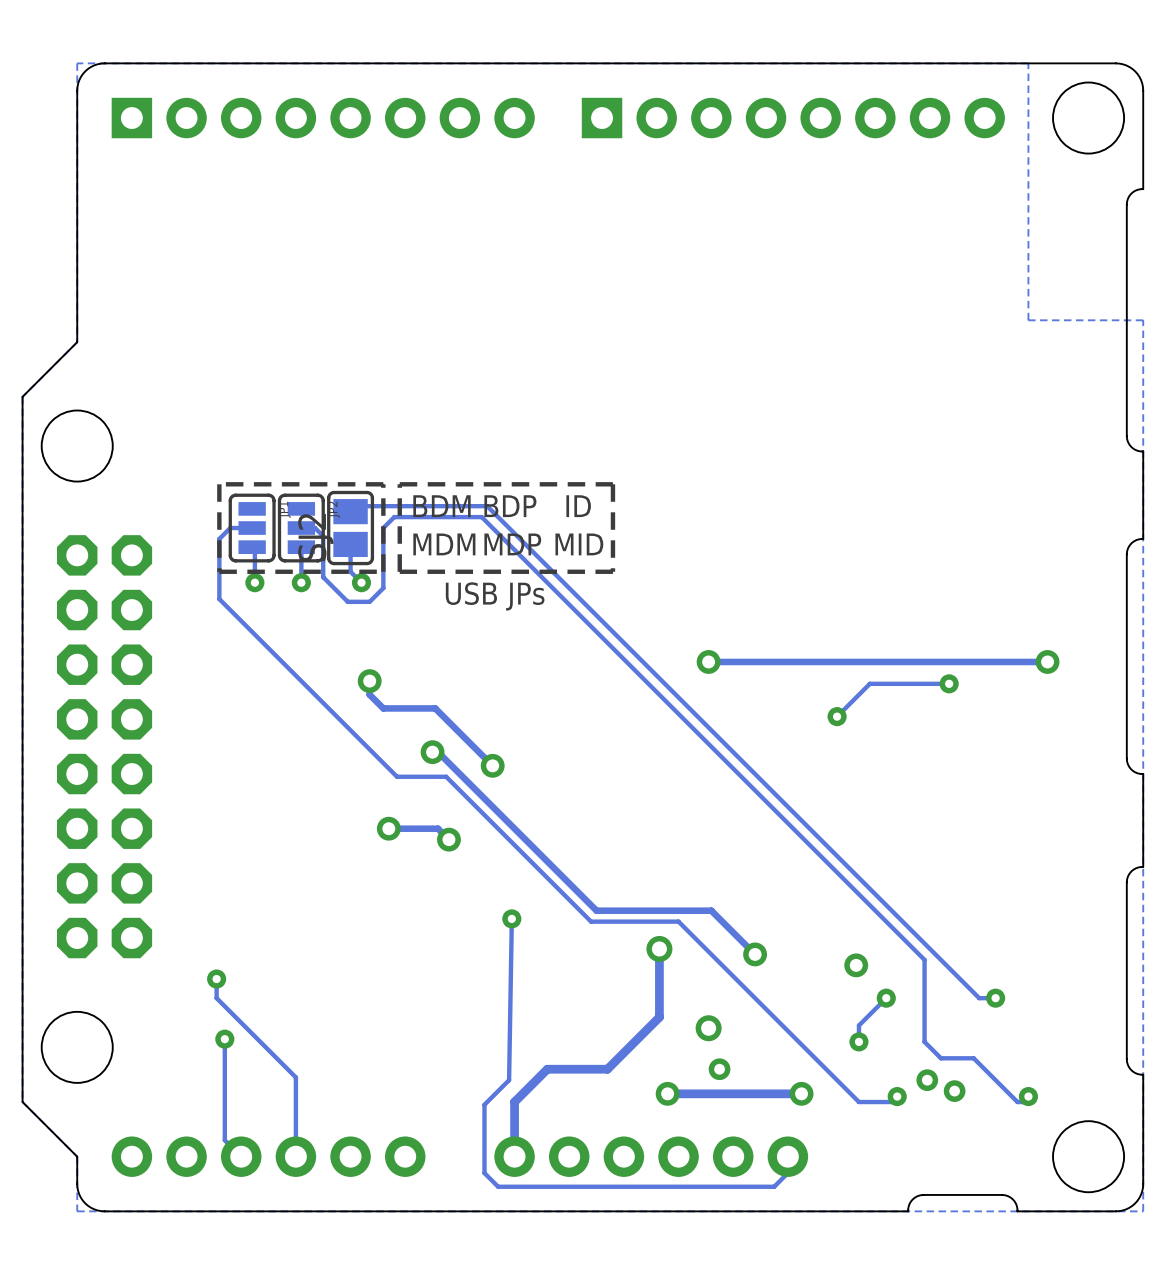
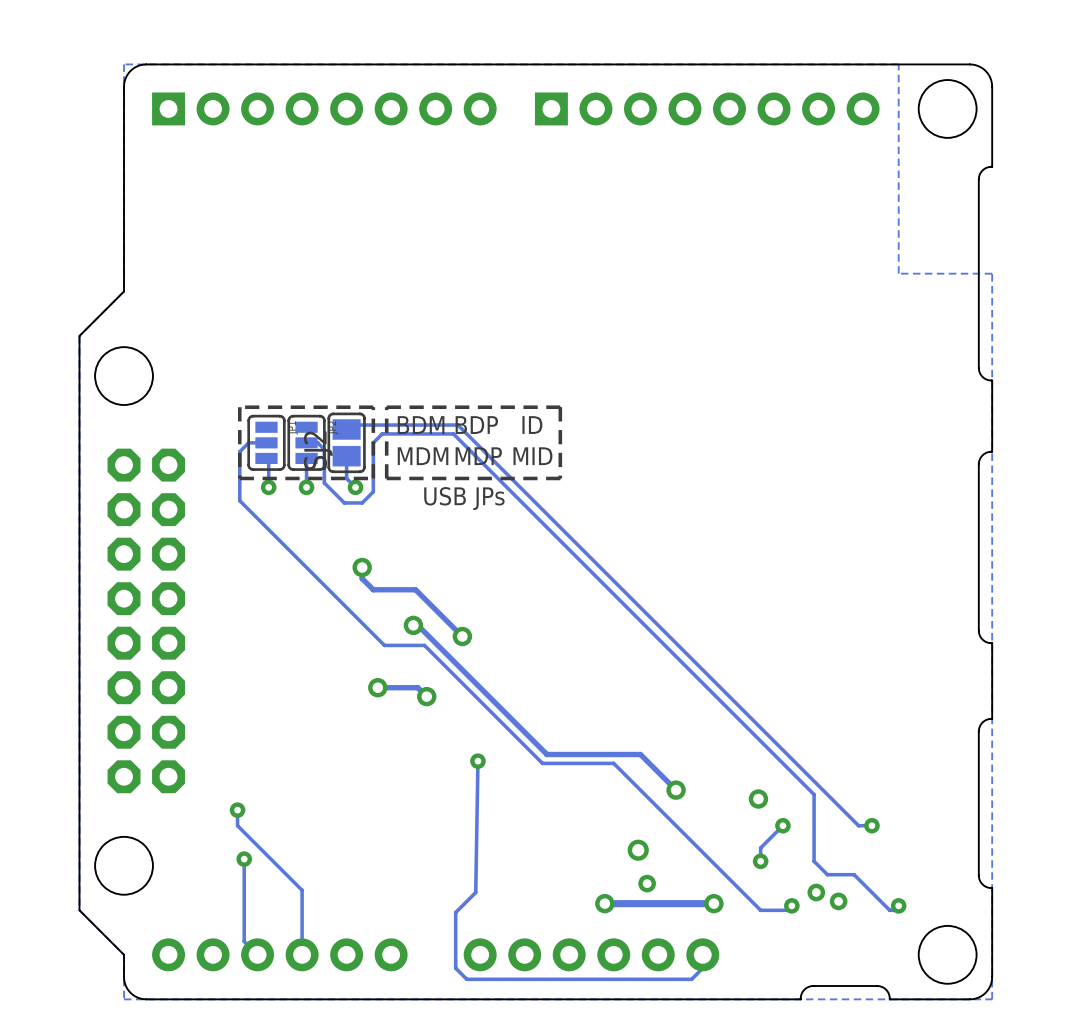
via: (708, 661) -> none
track: (1047, 661) (708, 661) -> none
via: (1047, 661) -> none
track: (949, 683) (869, 683) (837, 716) -> none
via: (949, 683) -> none
via: (837, 716) -> none
track: (659, 948) (659, 1017) (607, 1069) (547, 1069) (514, 1102) (514, 1156) -> none
via: (659, 948) -> none

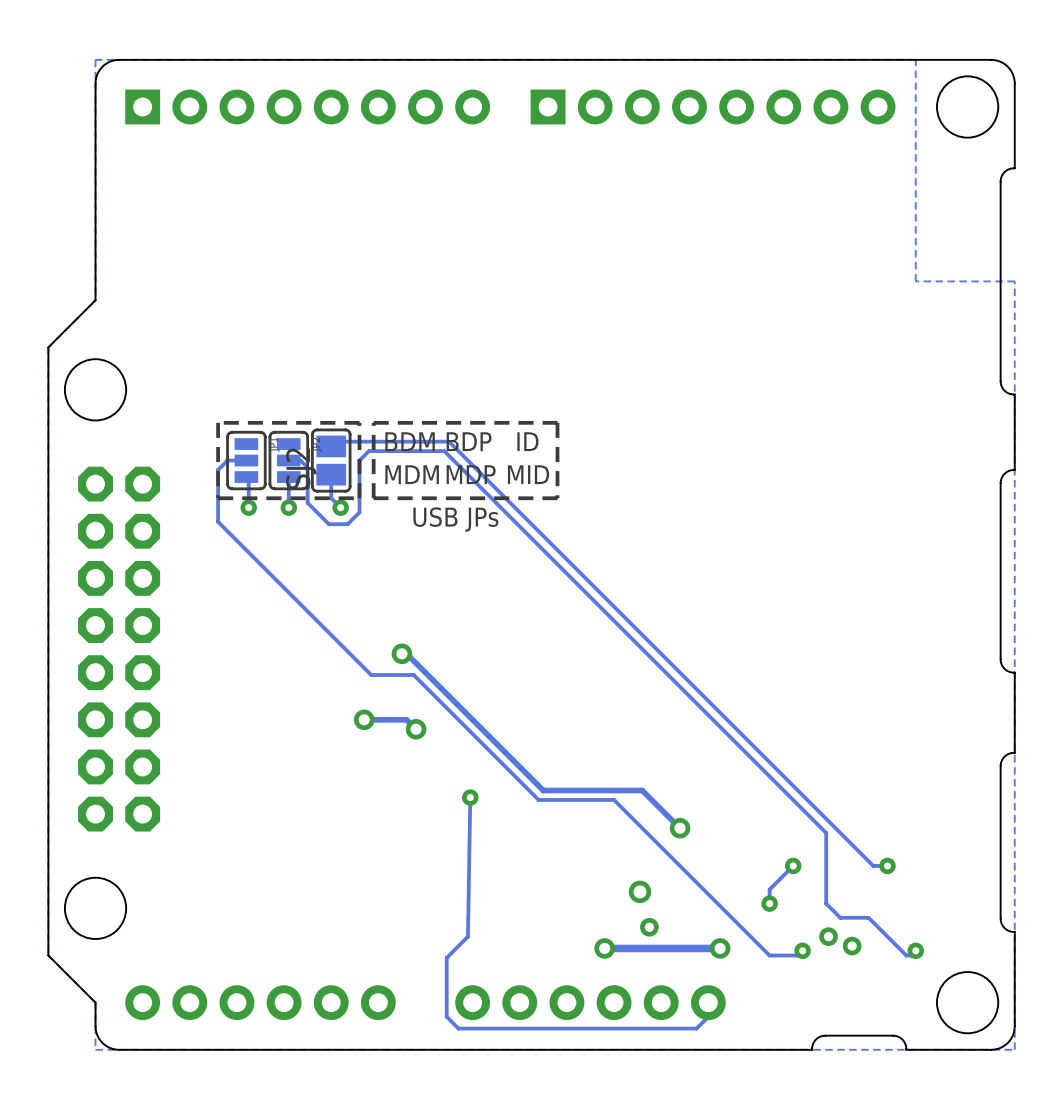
track: (362, 567) (362, 578) (373, 589) (415, 589) (462, 636) -> none
via: (362, 567) -> none
via: (462, 636) -> none
via: (758, 799) -> none
track: (237, 810) (237, 825) (302, 890) (302, 954) -> none
via: (237, 810) -> none
track: (244, 859) (244, 941) (257, 954) -> none
via: (244, 859) -> none

